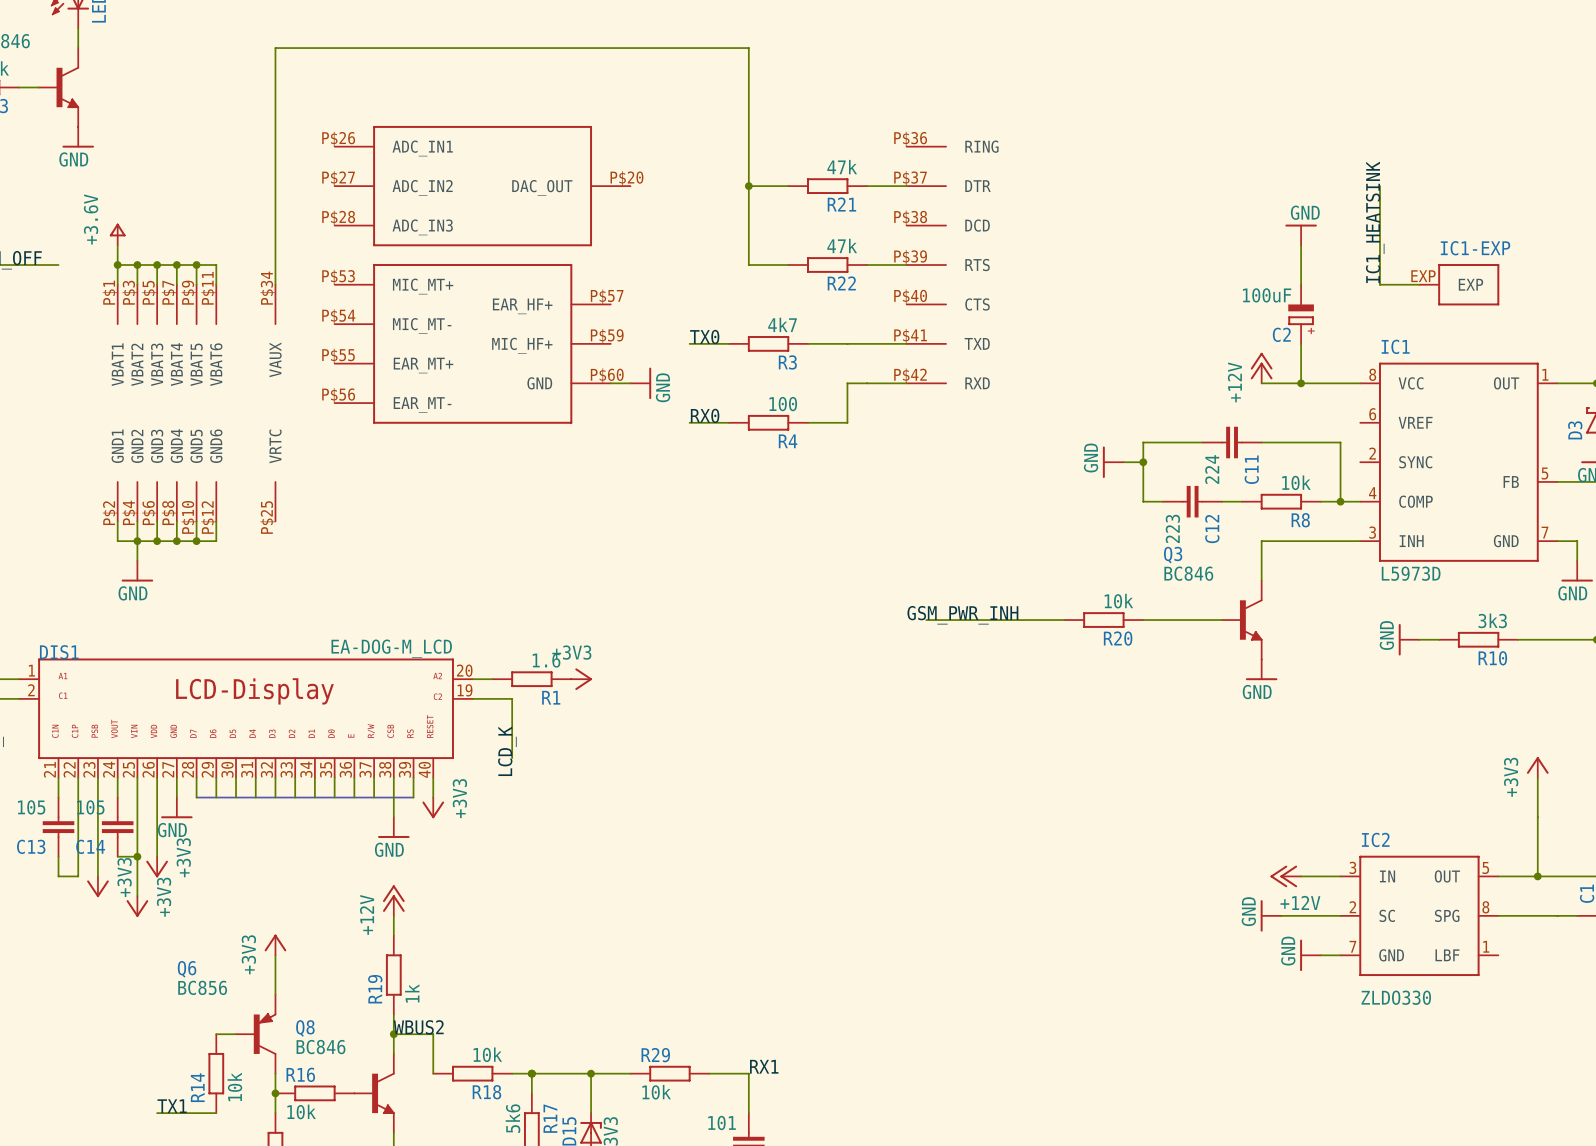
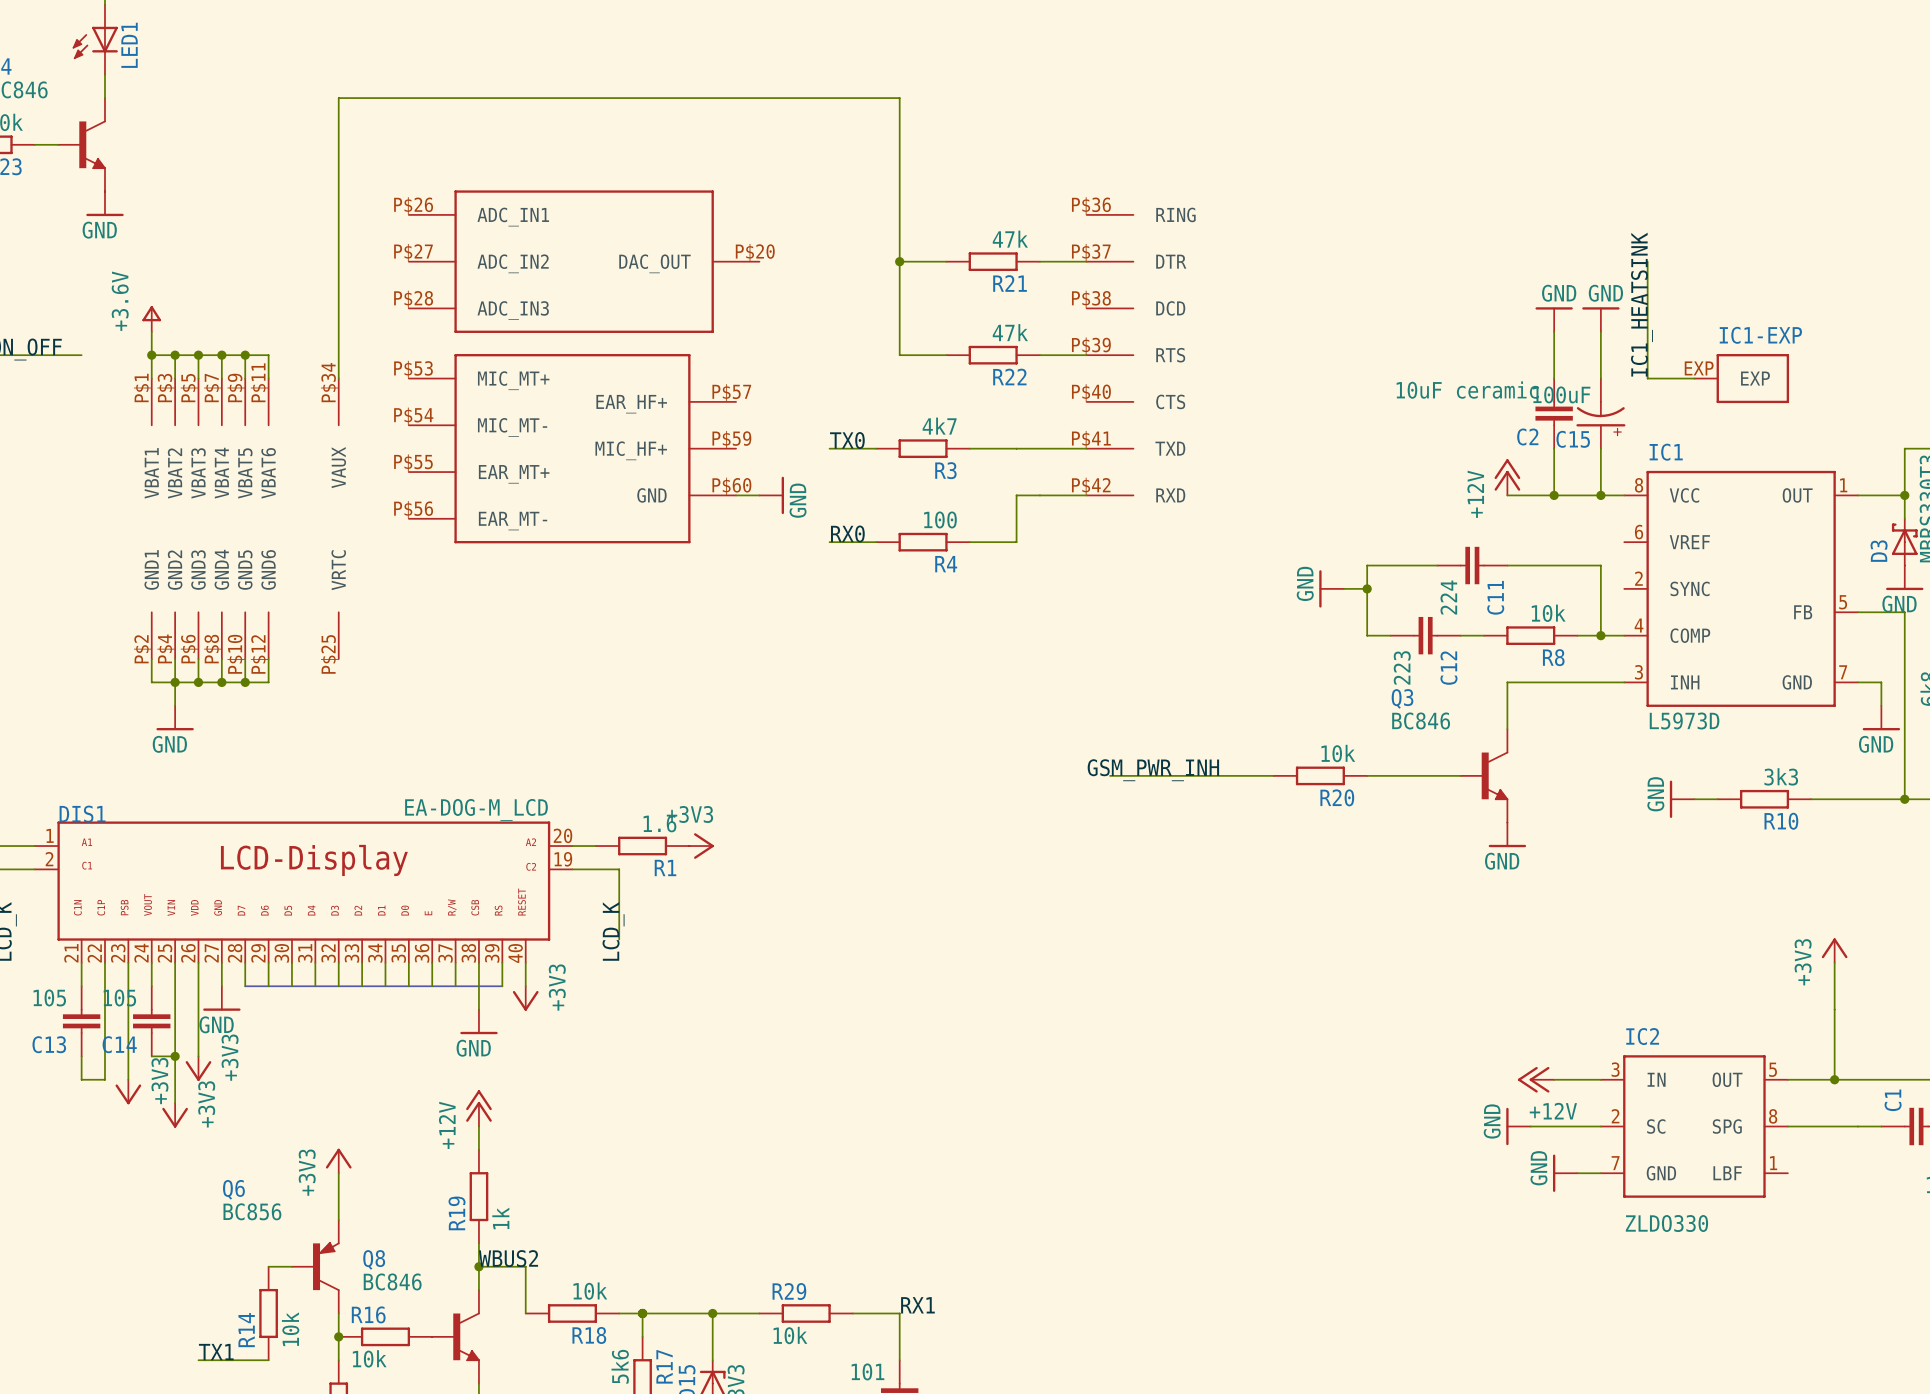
power symbol: none -> GND (1600, 319)
wire: none -> (1600, 331) (1600, 378)
C2 symbol: [1288, 284, 1314, 344] -> [1535, 378, 1573, 449]
C2 value: 100uF (1267, 295) -> 10uF ceramic (1467, 390)
C15: none -> 100uF (1600, 413)
wire: none -> (1600, 448) (1600, 495)
junction: none -> (1600, 495)

